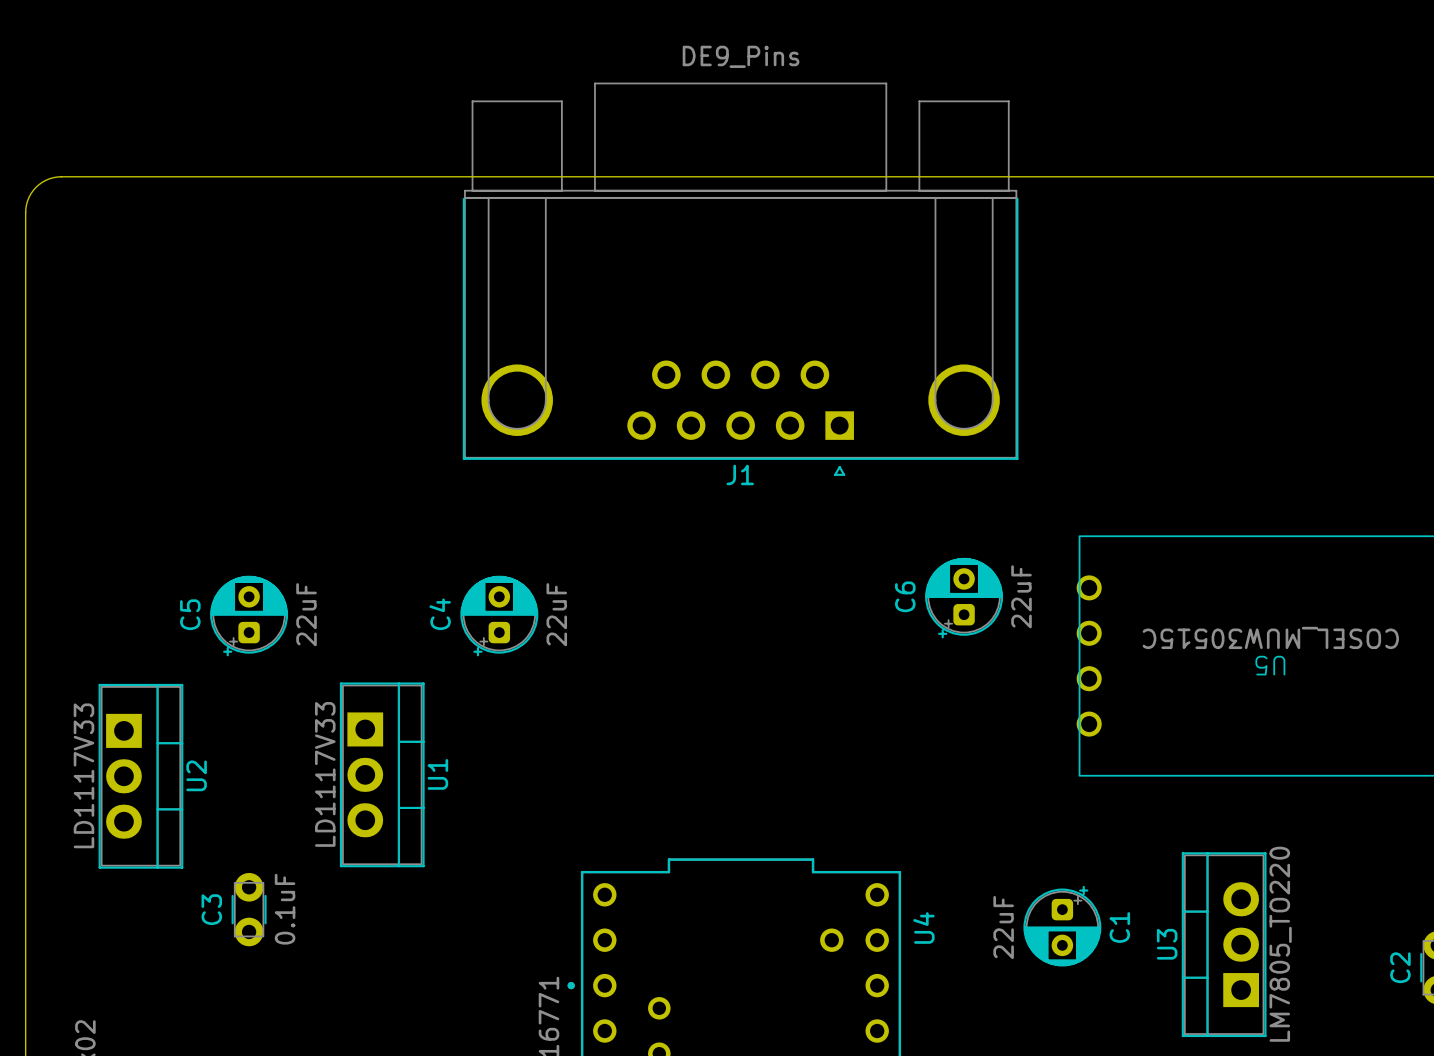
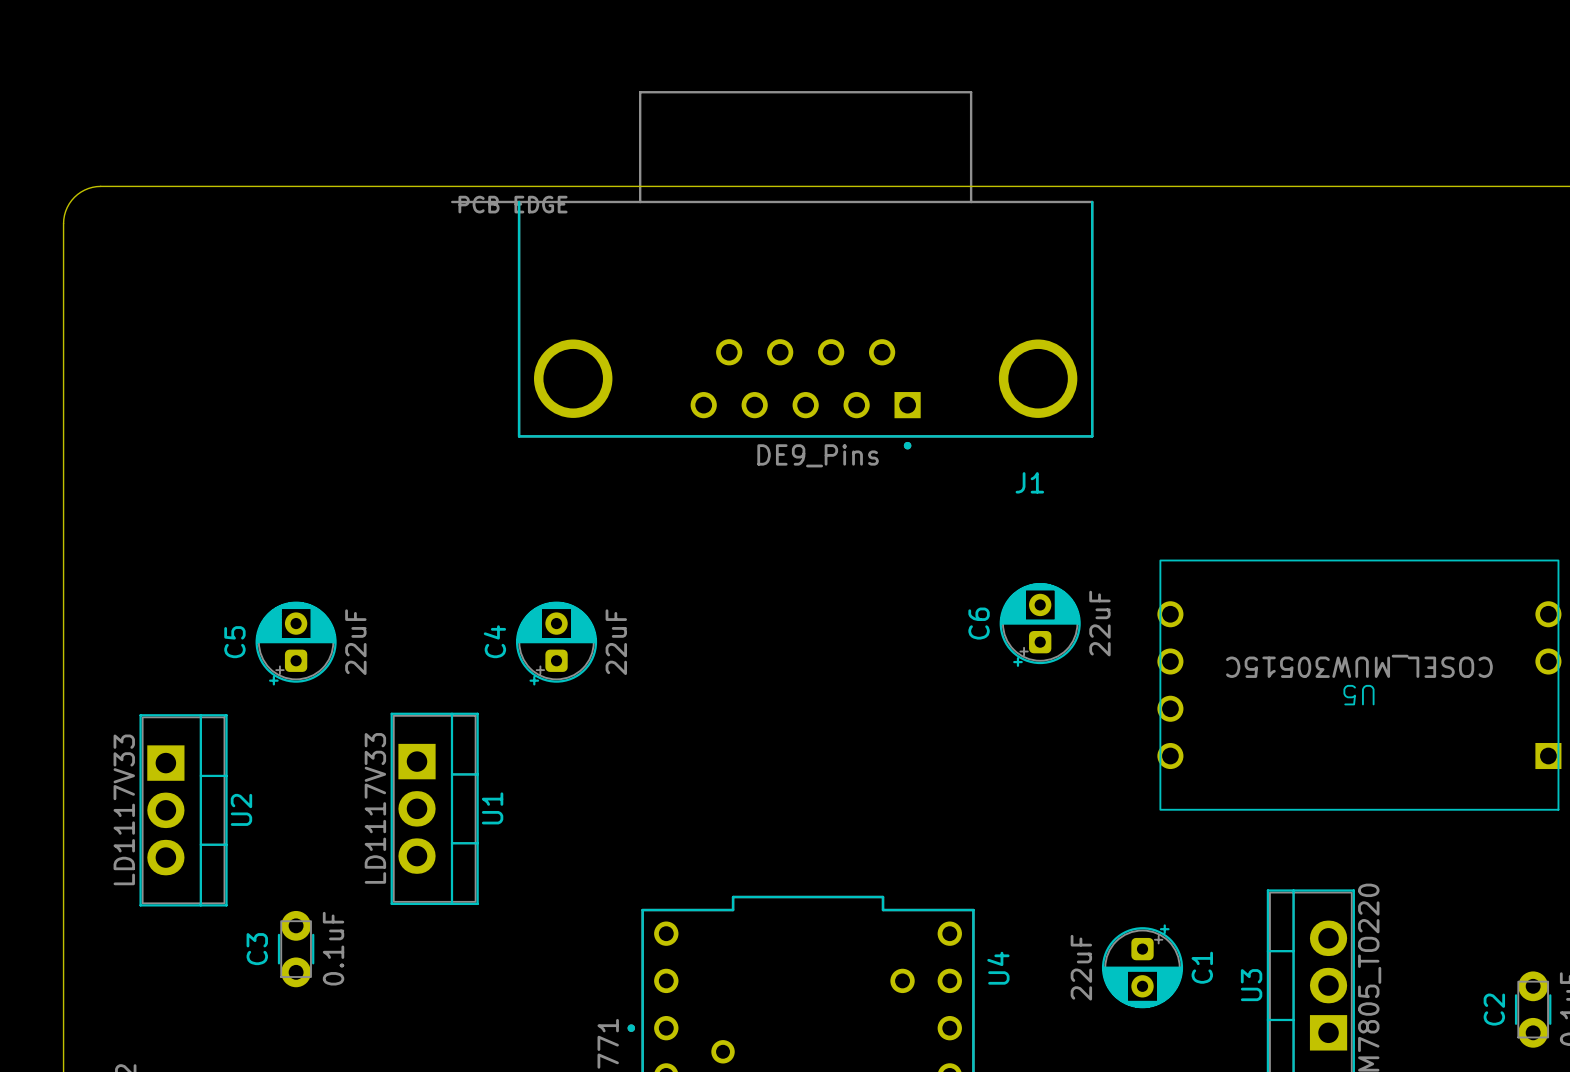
J1 value position: DE9_Pins (741, 56) -> DE9_Pins (818, 455)
J1 footprint: [462, 82, 1019, 476] -> [451, 91, 1094, 450]
J1 name position: J1 (740, 474) -> J1 (1029, 482)

